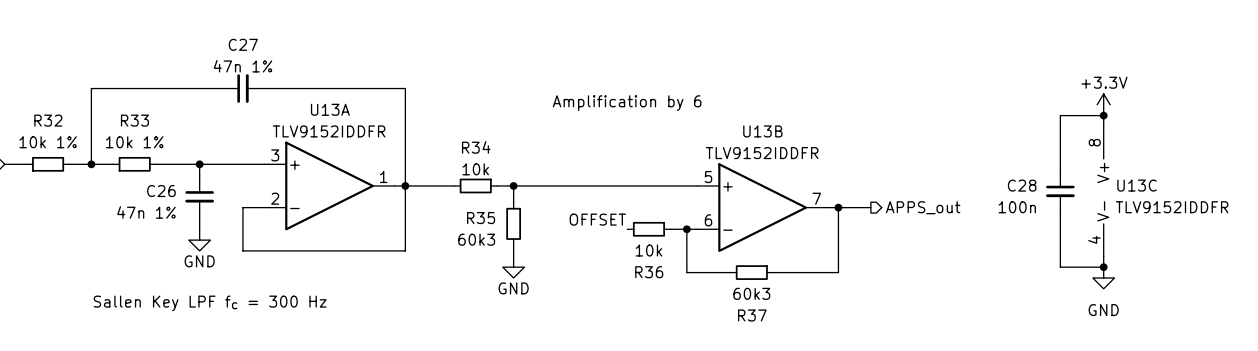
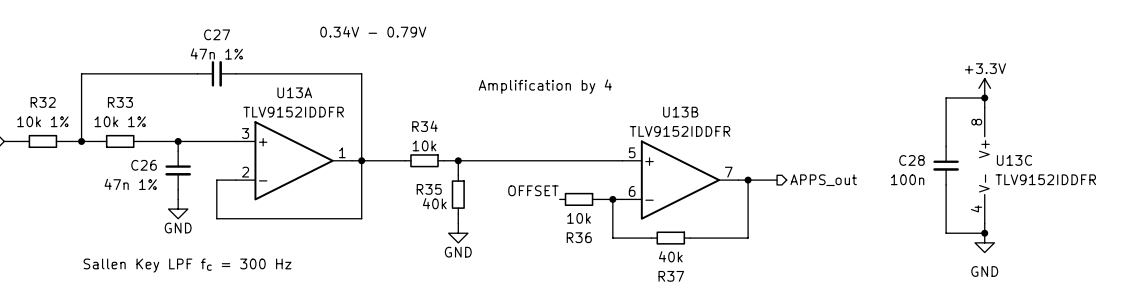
text: none -> 0.34V - 0.79V (373, 31)
text: Amplification by 6 (627, 103) -> Amplification by 4 (545, 86)
R35 value: 60k3 (476, 239) -> 40k (434, 203)
R37 value: 60k3 (751, 293) -> 40k (670, 256)

